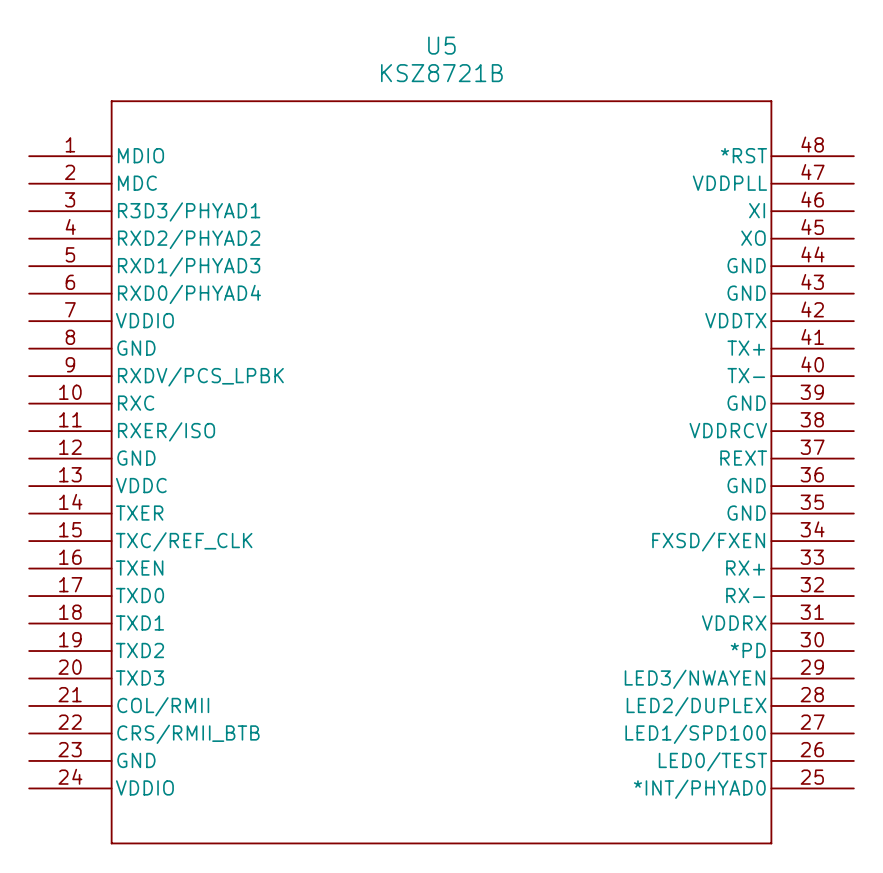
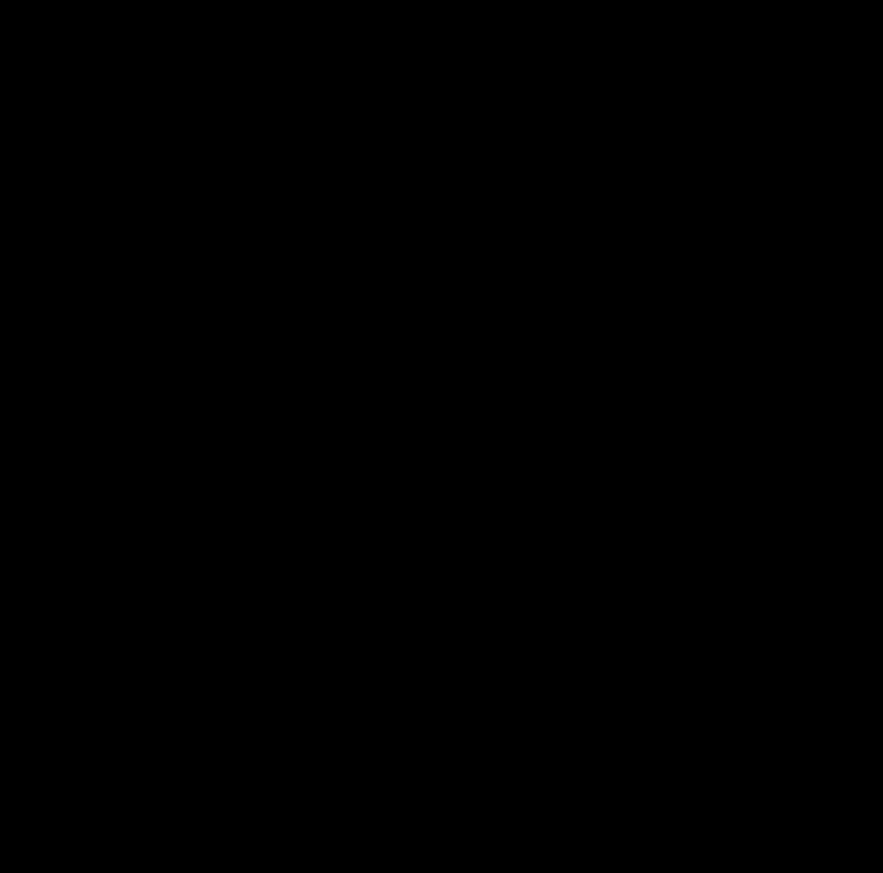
U5: KSZ8721B (441, 472) -> none

